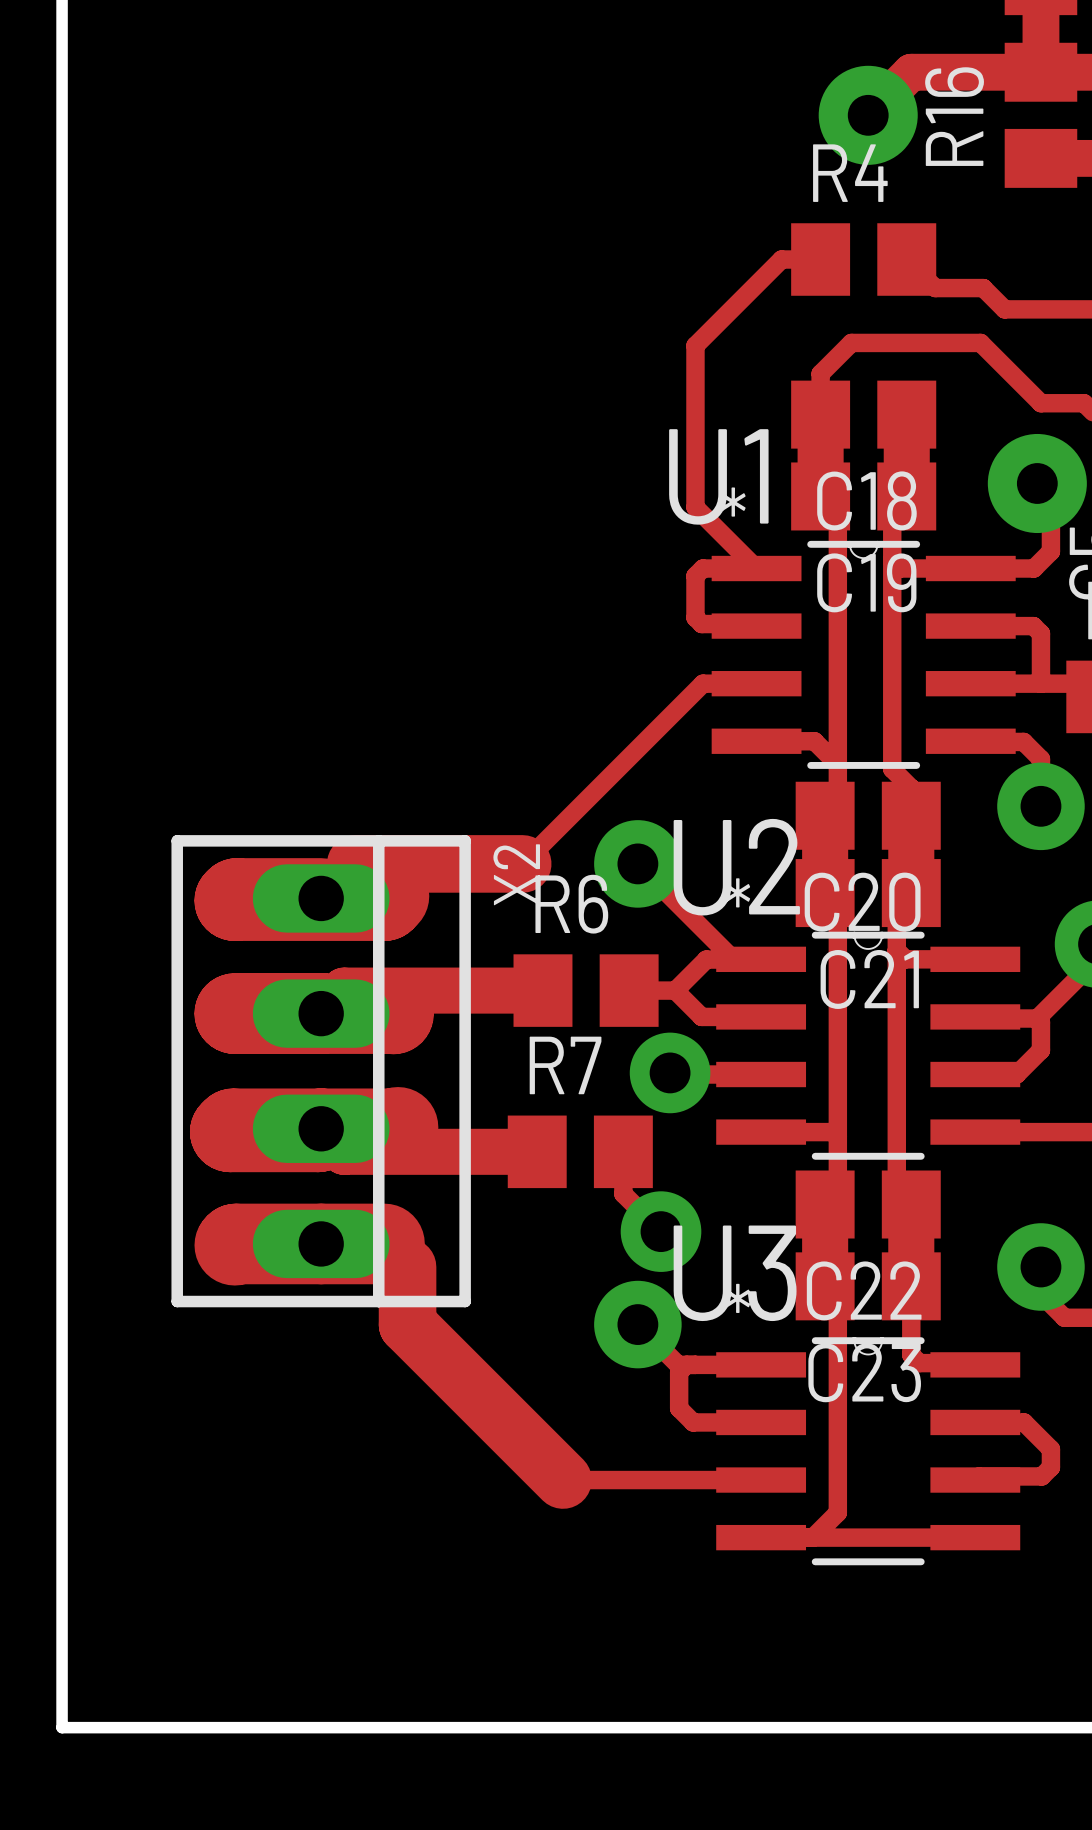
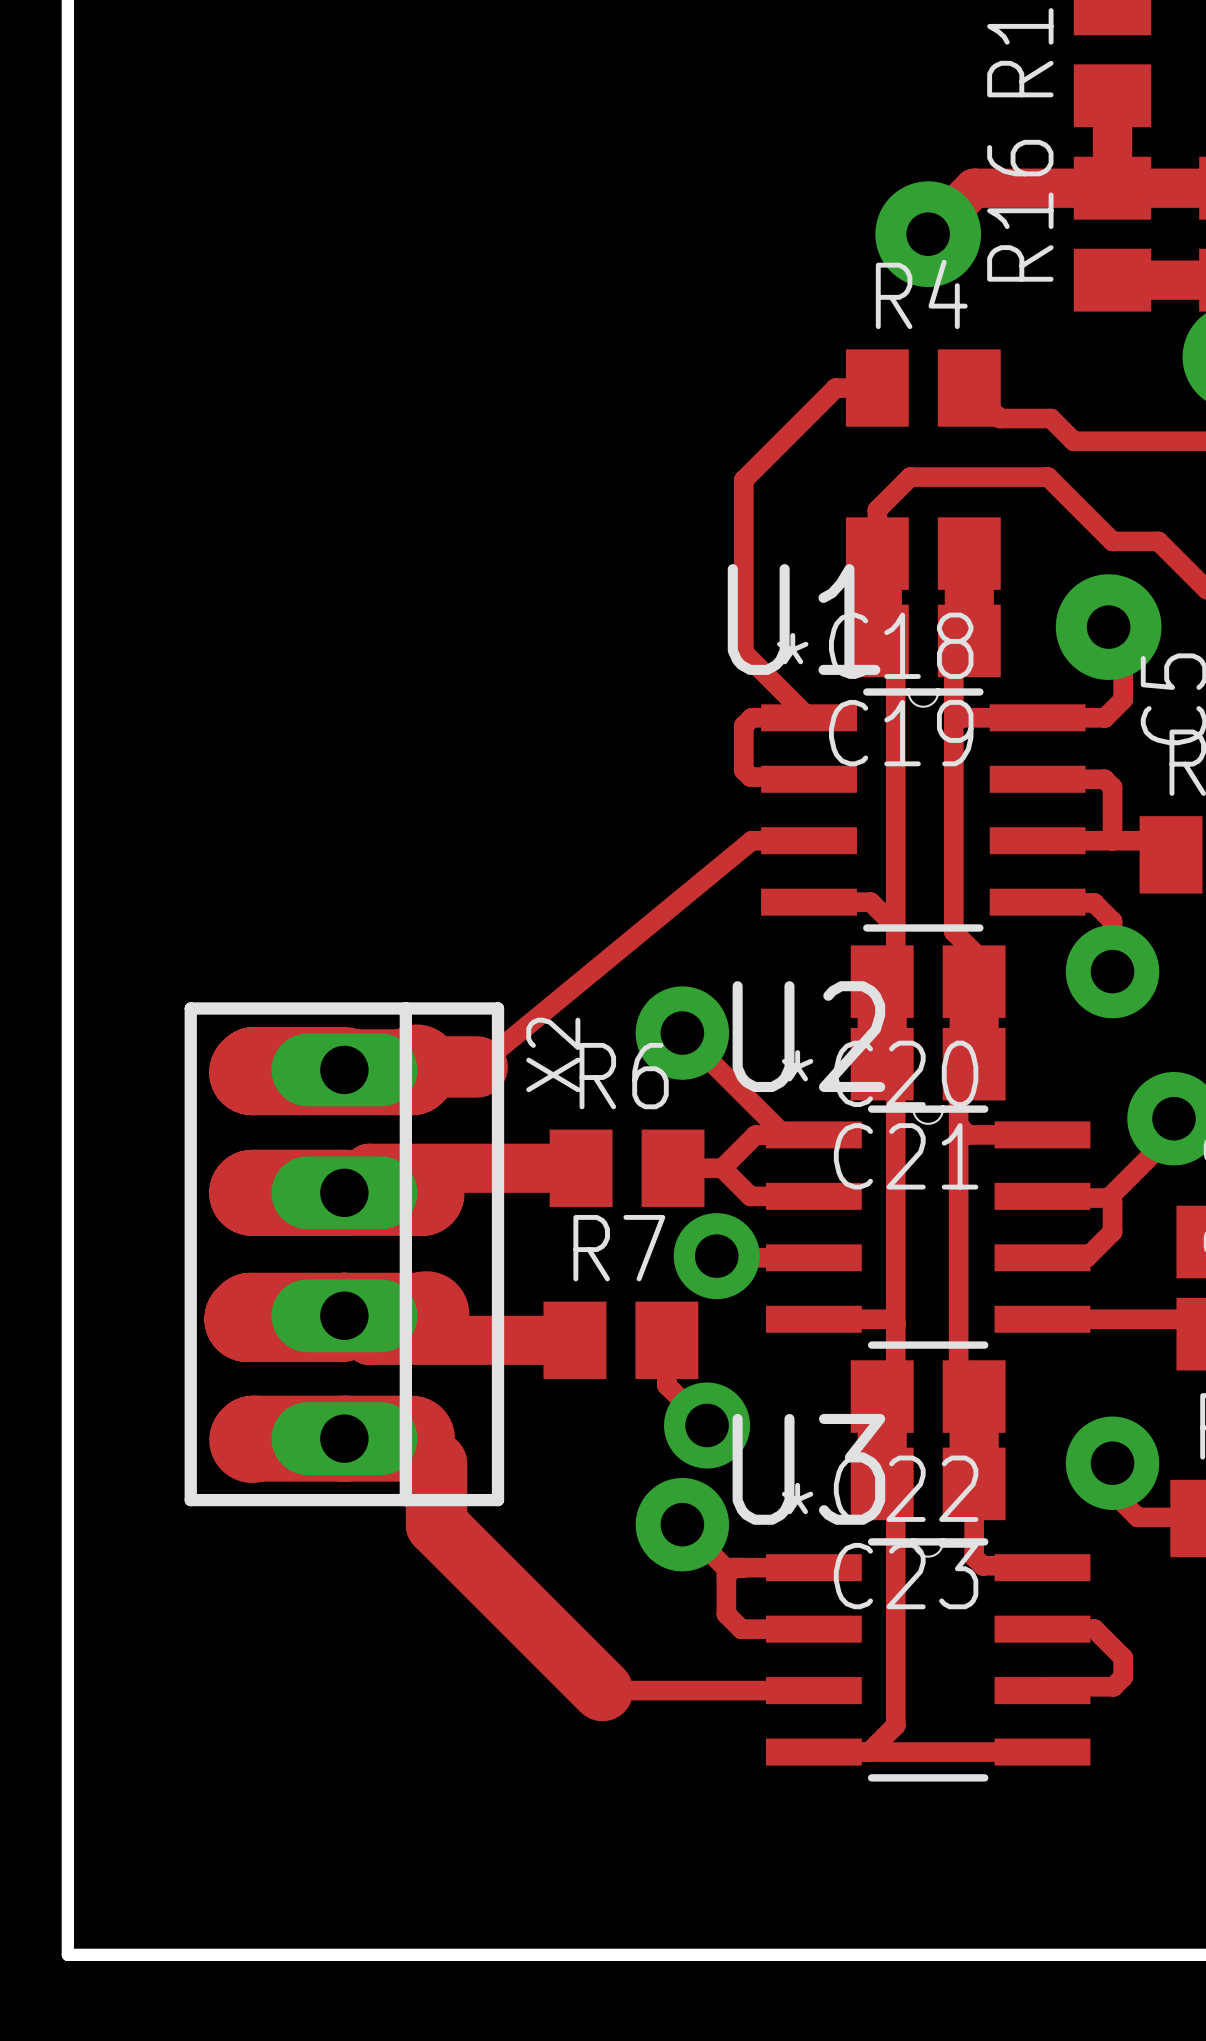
track: (702, 683) (522, 863) (355, 863) (321, 898) -> (751, 840) (477, 1066) (298, 1066) (344, 1069)

